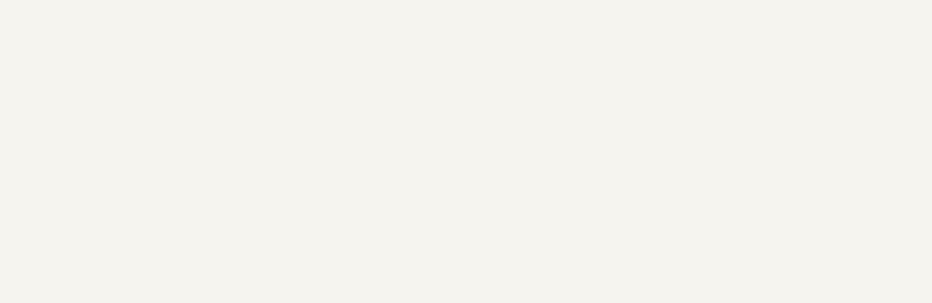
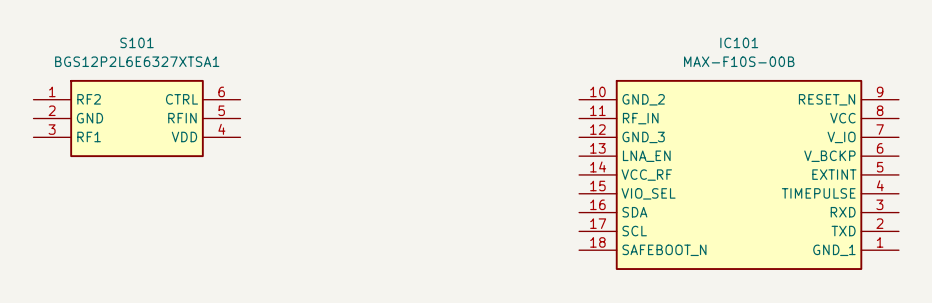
S101: none -> BGS12P2L6E6327XTSA1 (137, 118)
IC101: none -> MAX-F10S-00B (739, 174)

